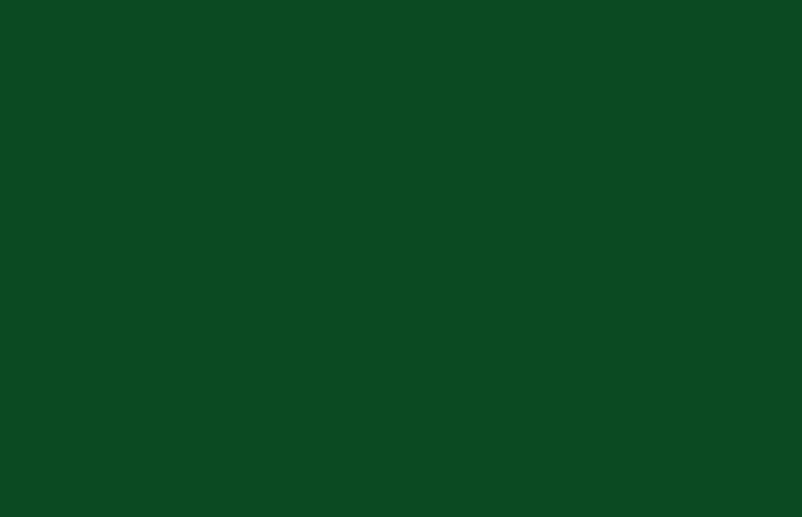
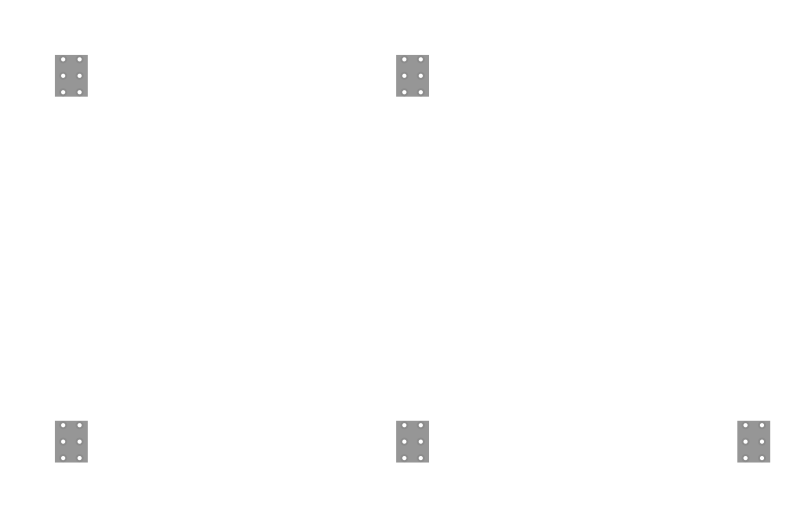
part: none -> (71, 75)
part: none -> (412, 75)
part: none -> (71, 441)
part: none -> (412, 441)
part: none -> (753, 441)

